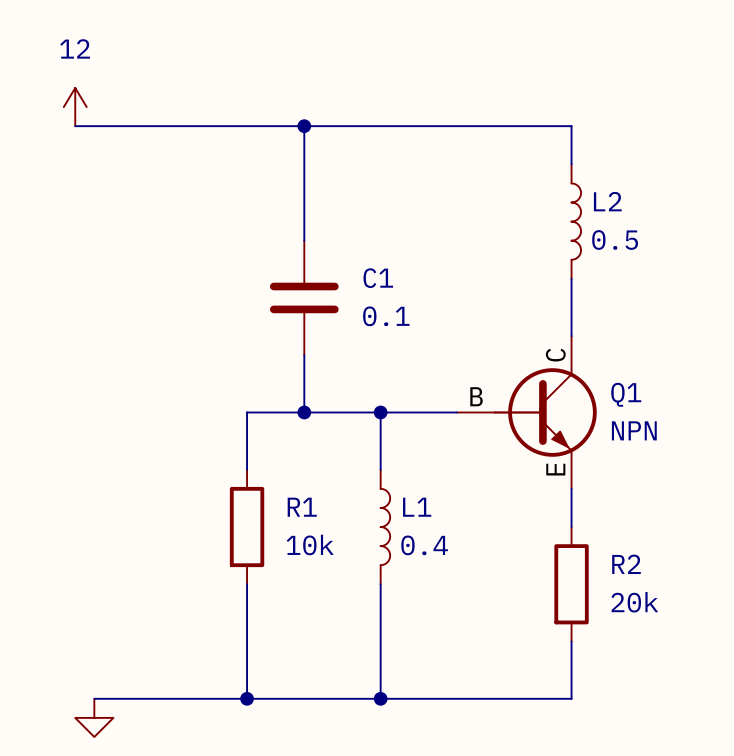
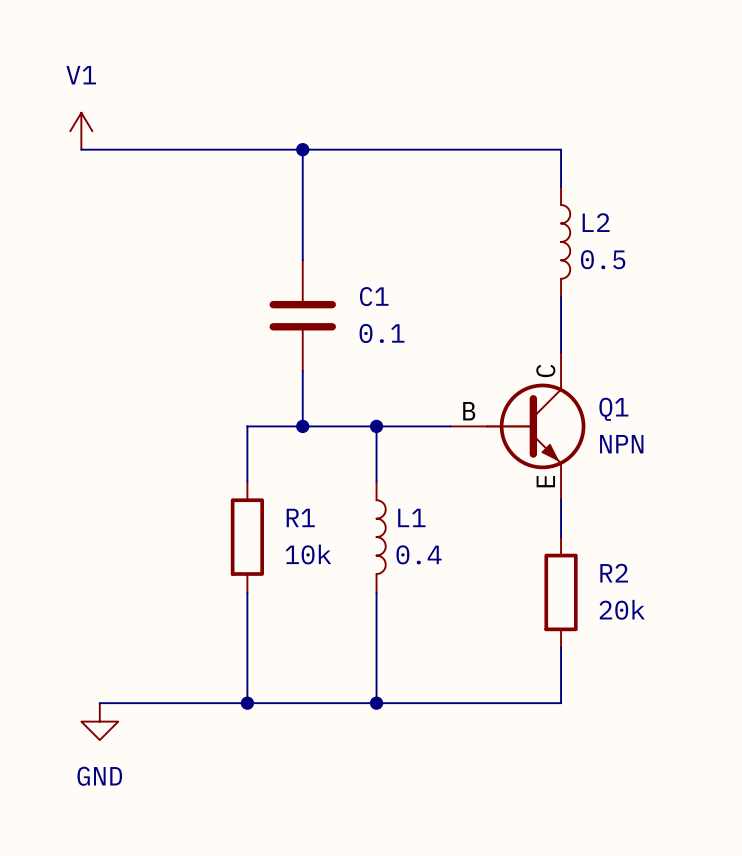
power symbol: 12 (75, 107) -> V1 (81, 131)

